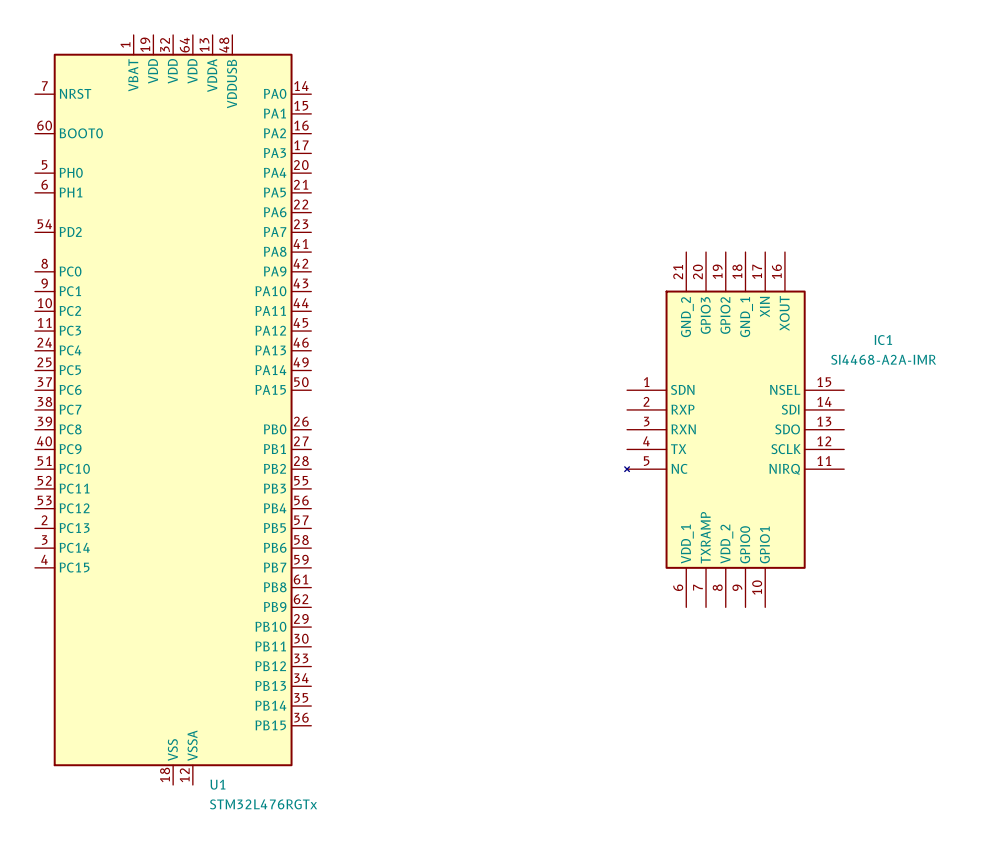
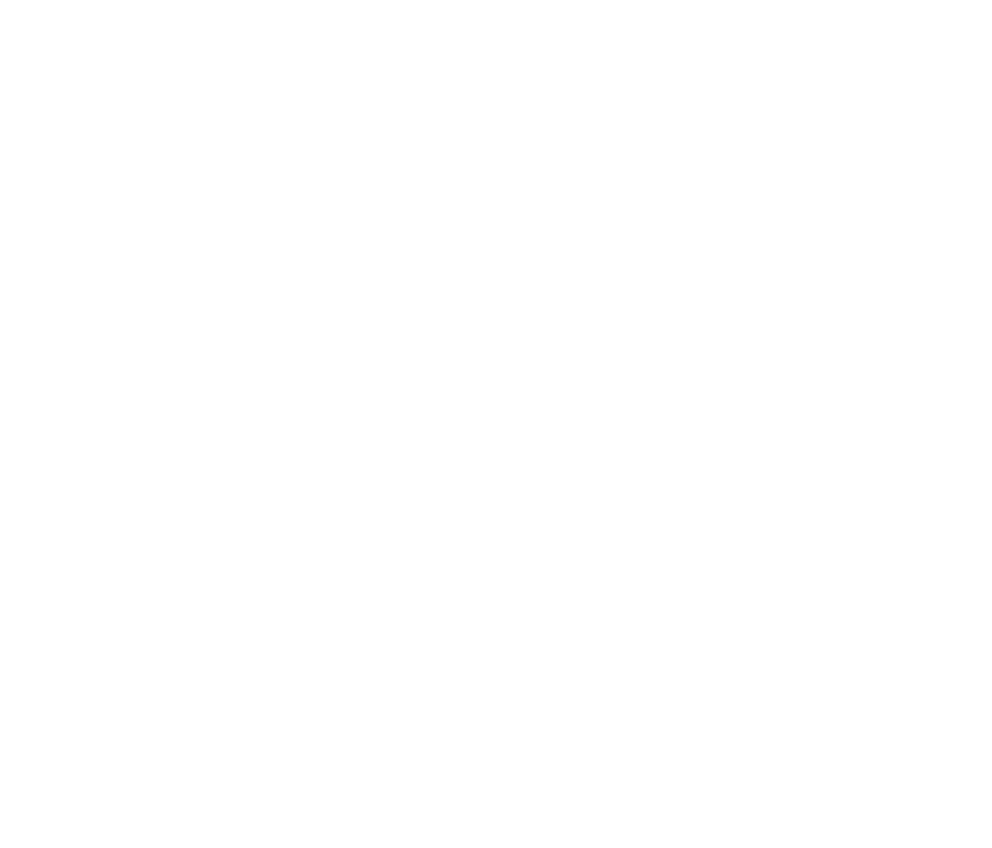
U1: STM32L476RGTx (173, 409) -> none
IC1: SI4468-A2A-IMR (734, 429) -> none

